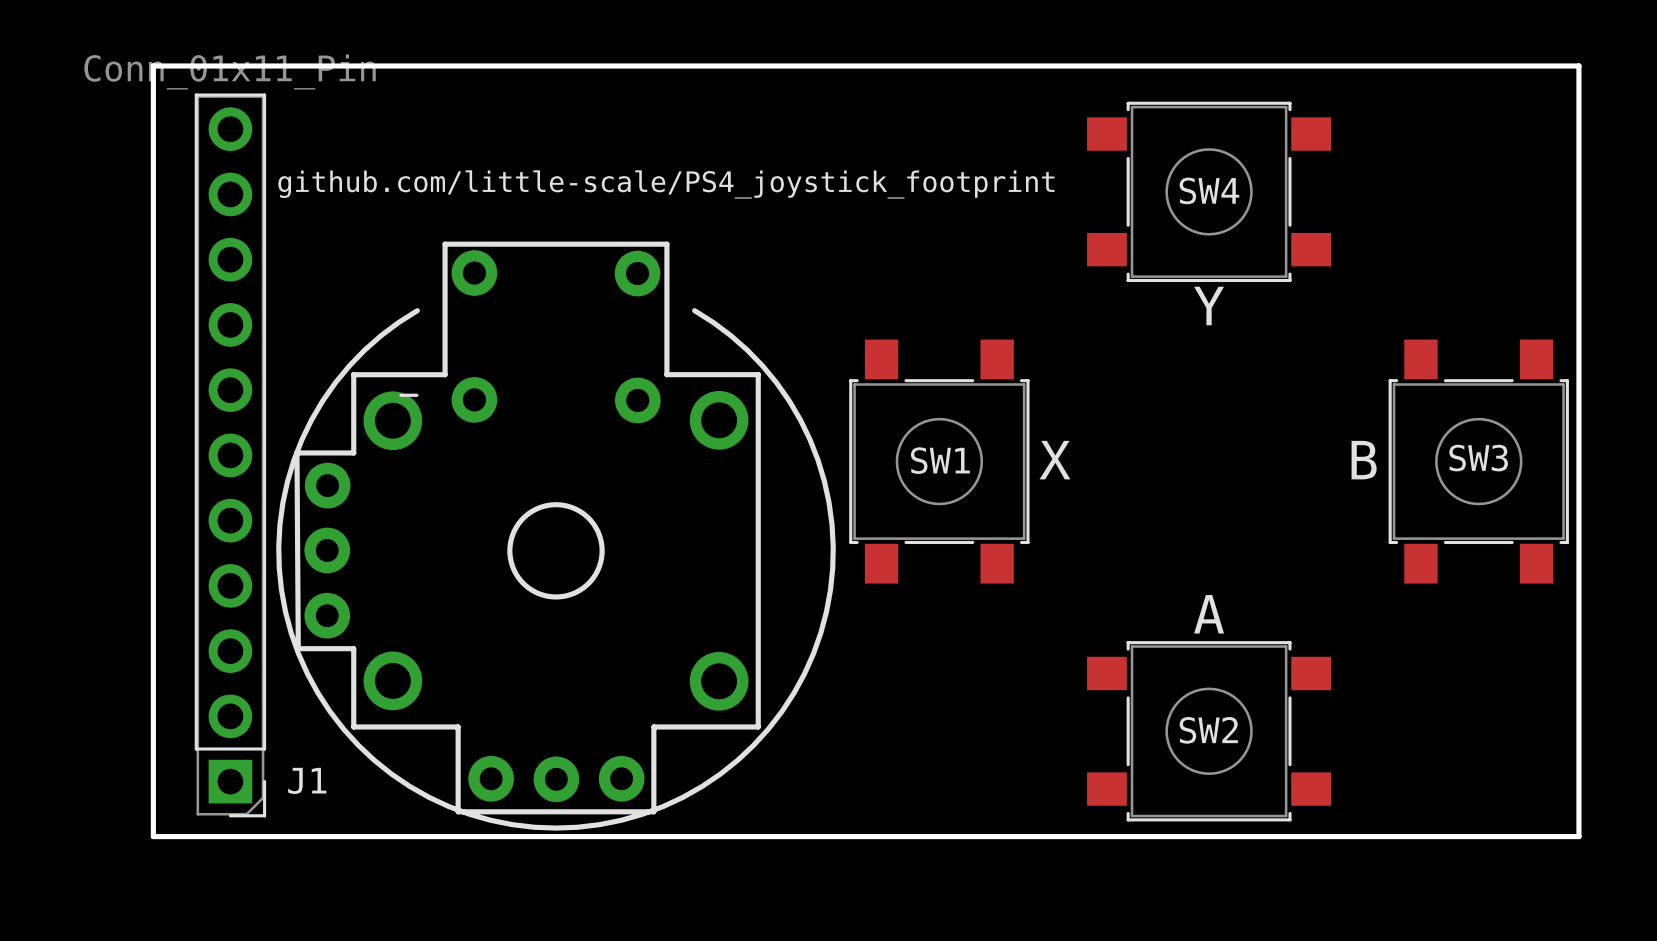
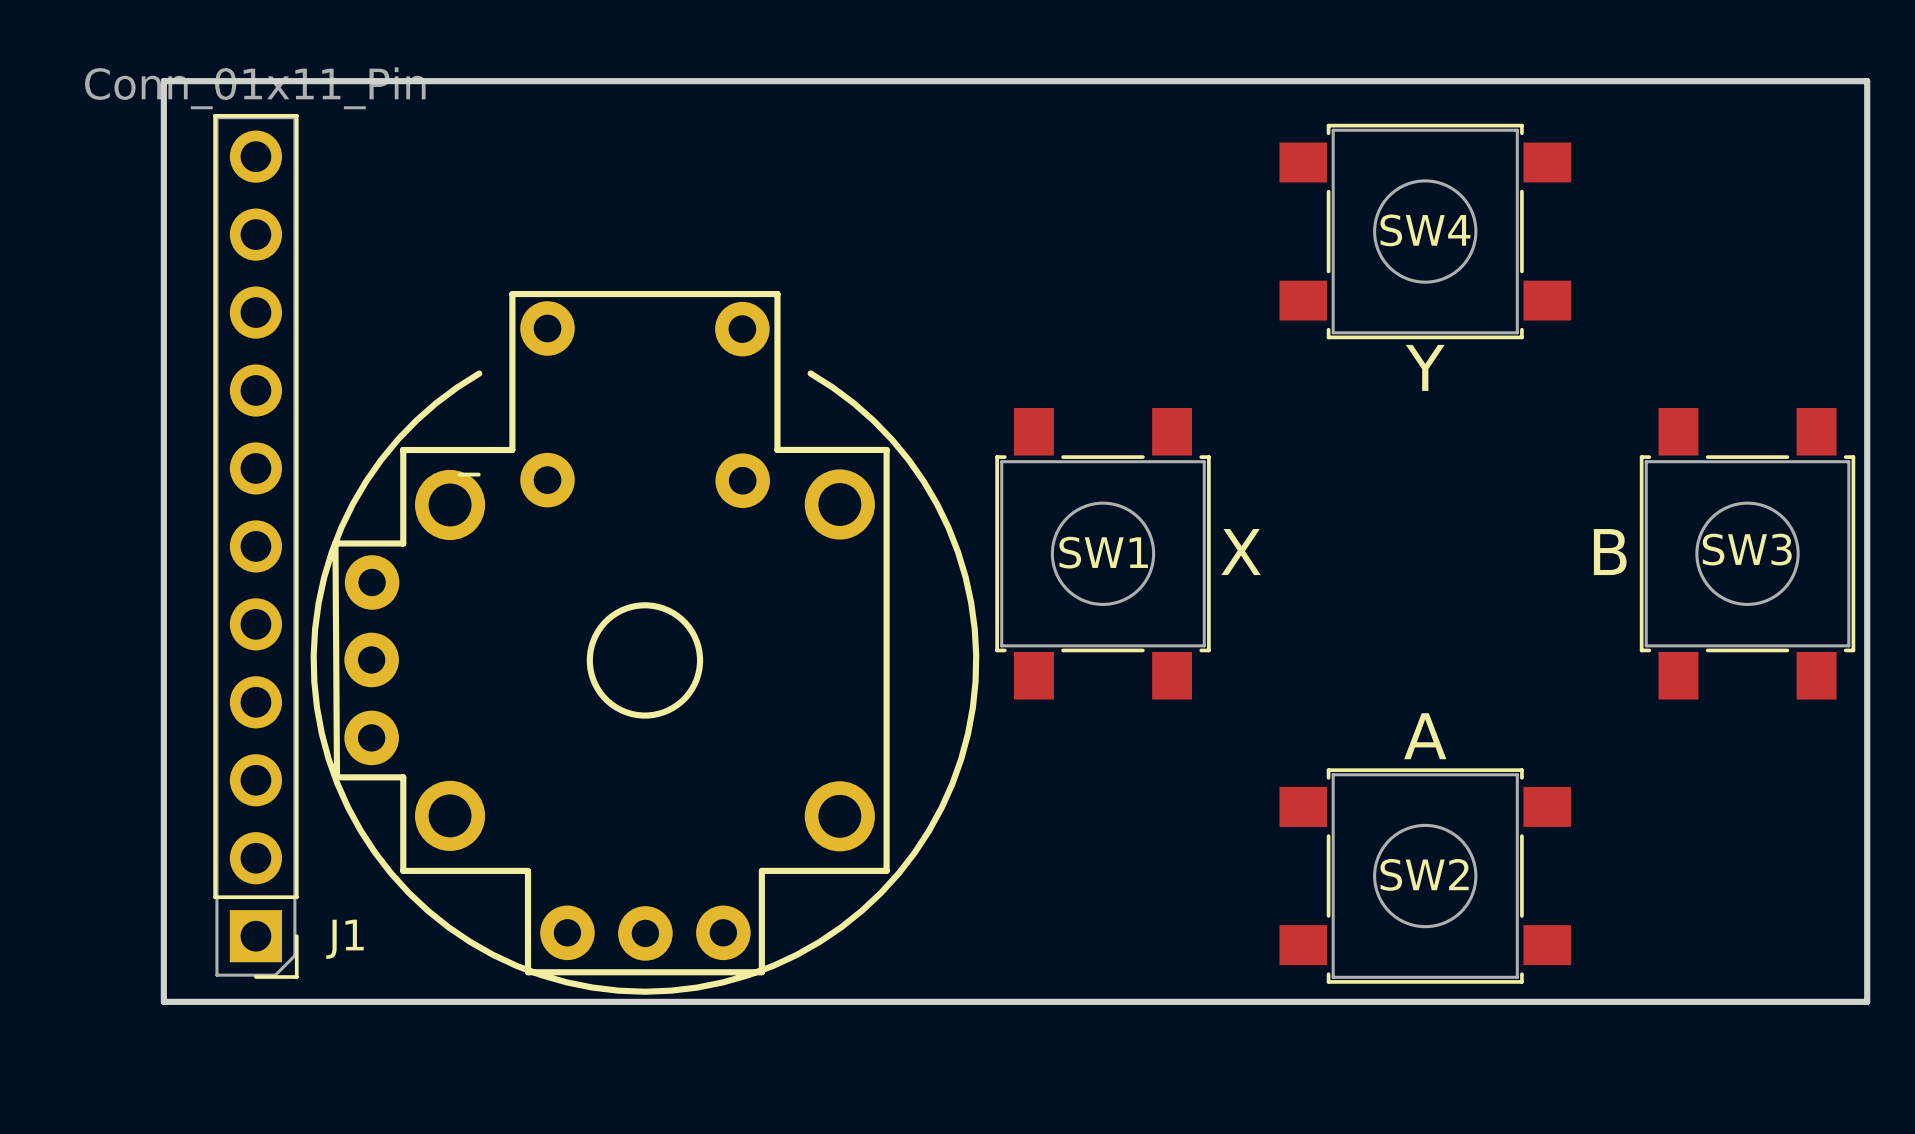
text: github.com/little-scale/PS4_joystick_footprint (666, 184) -> none

